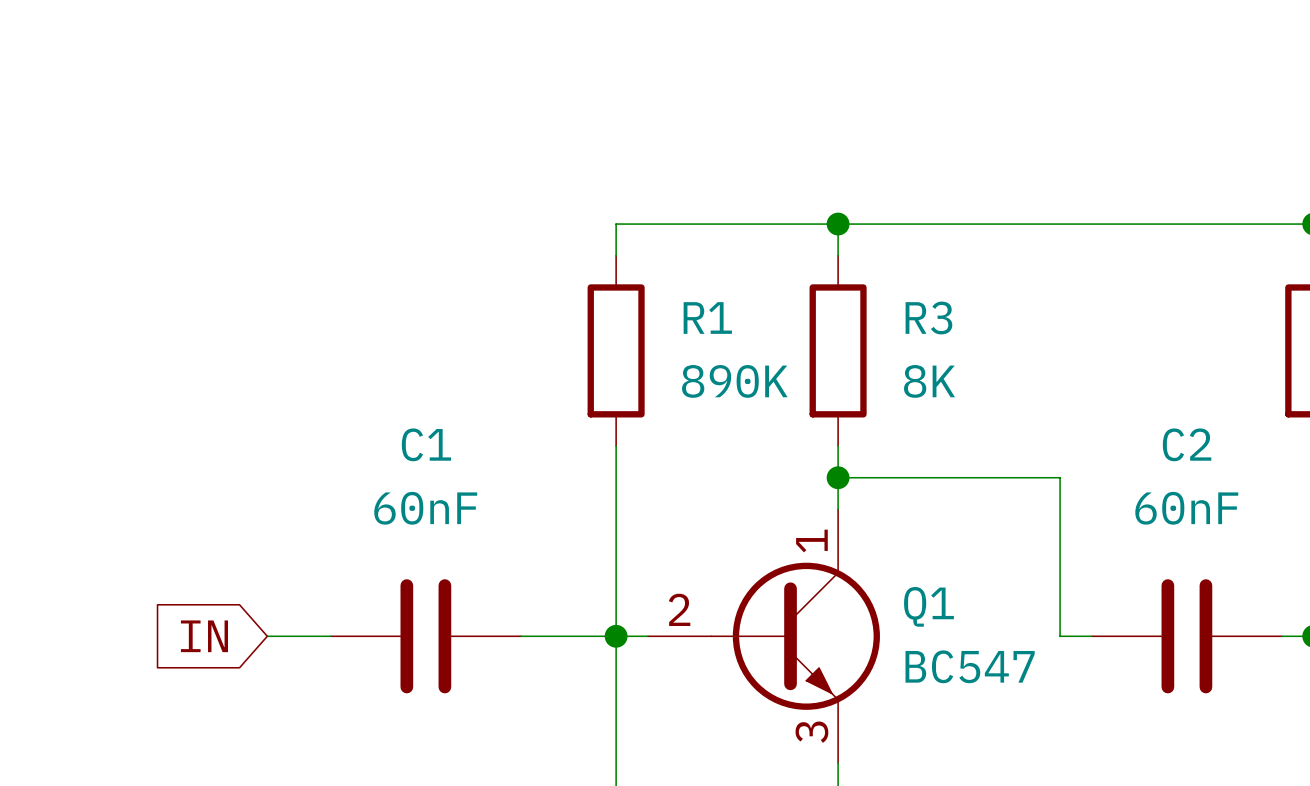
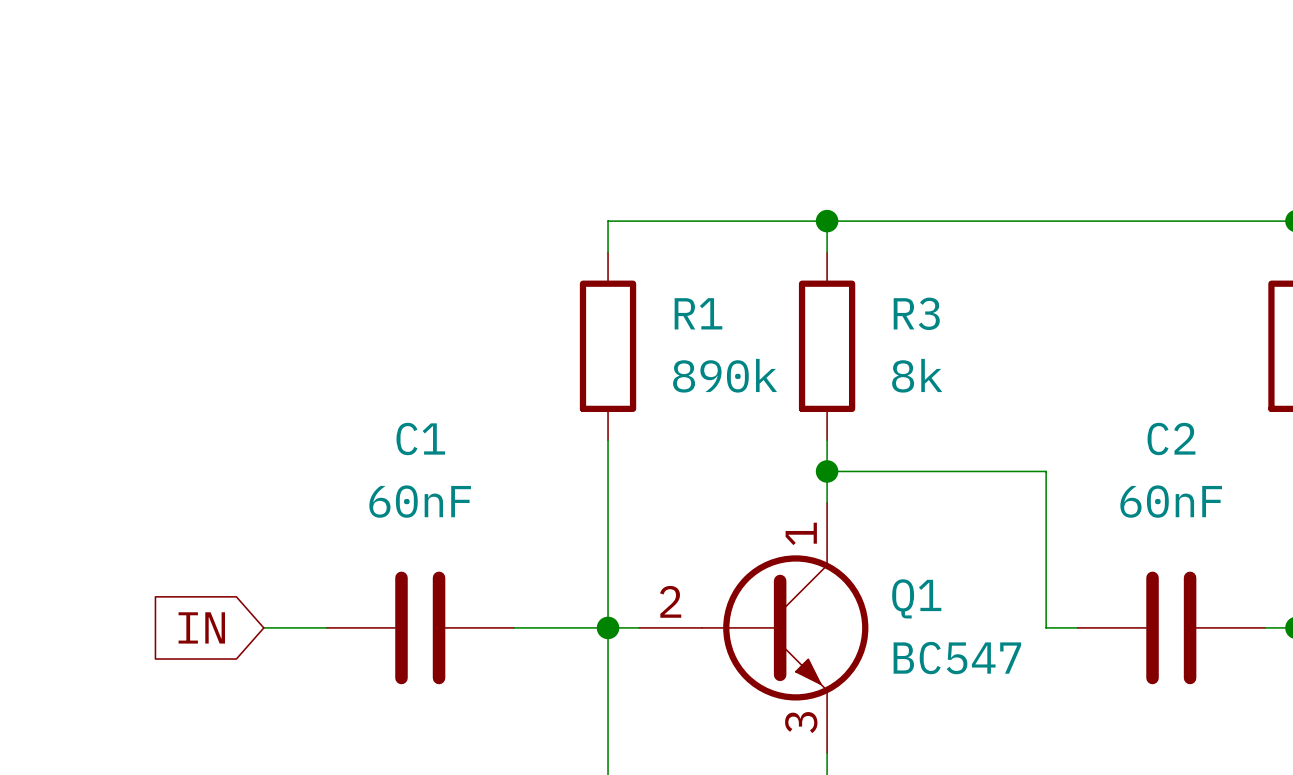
R1 value: 890K (734, 381) -> 890k (725, 375)
R3 value: 8K (929, 381) -> 8k (917, 375)

